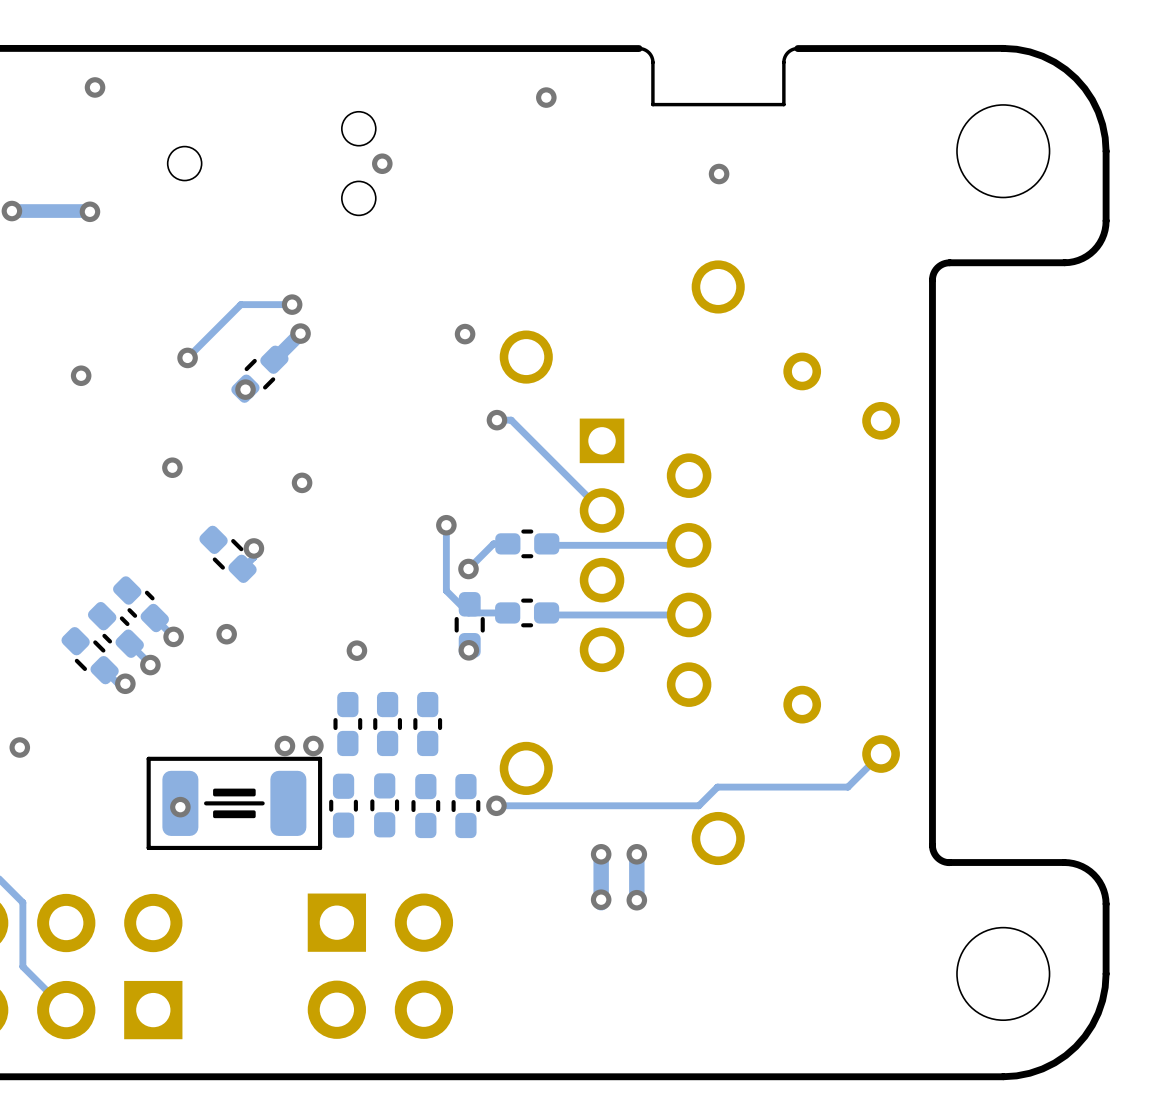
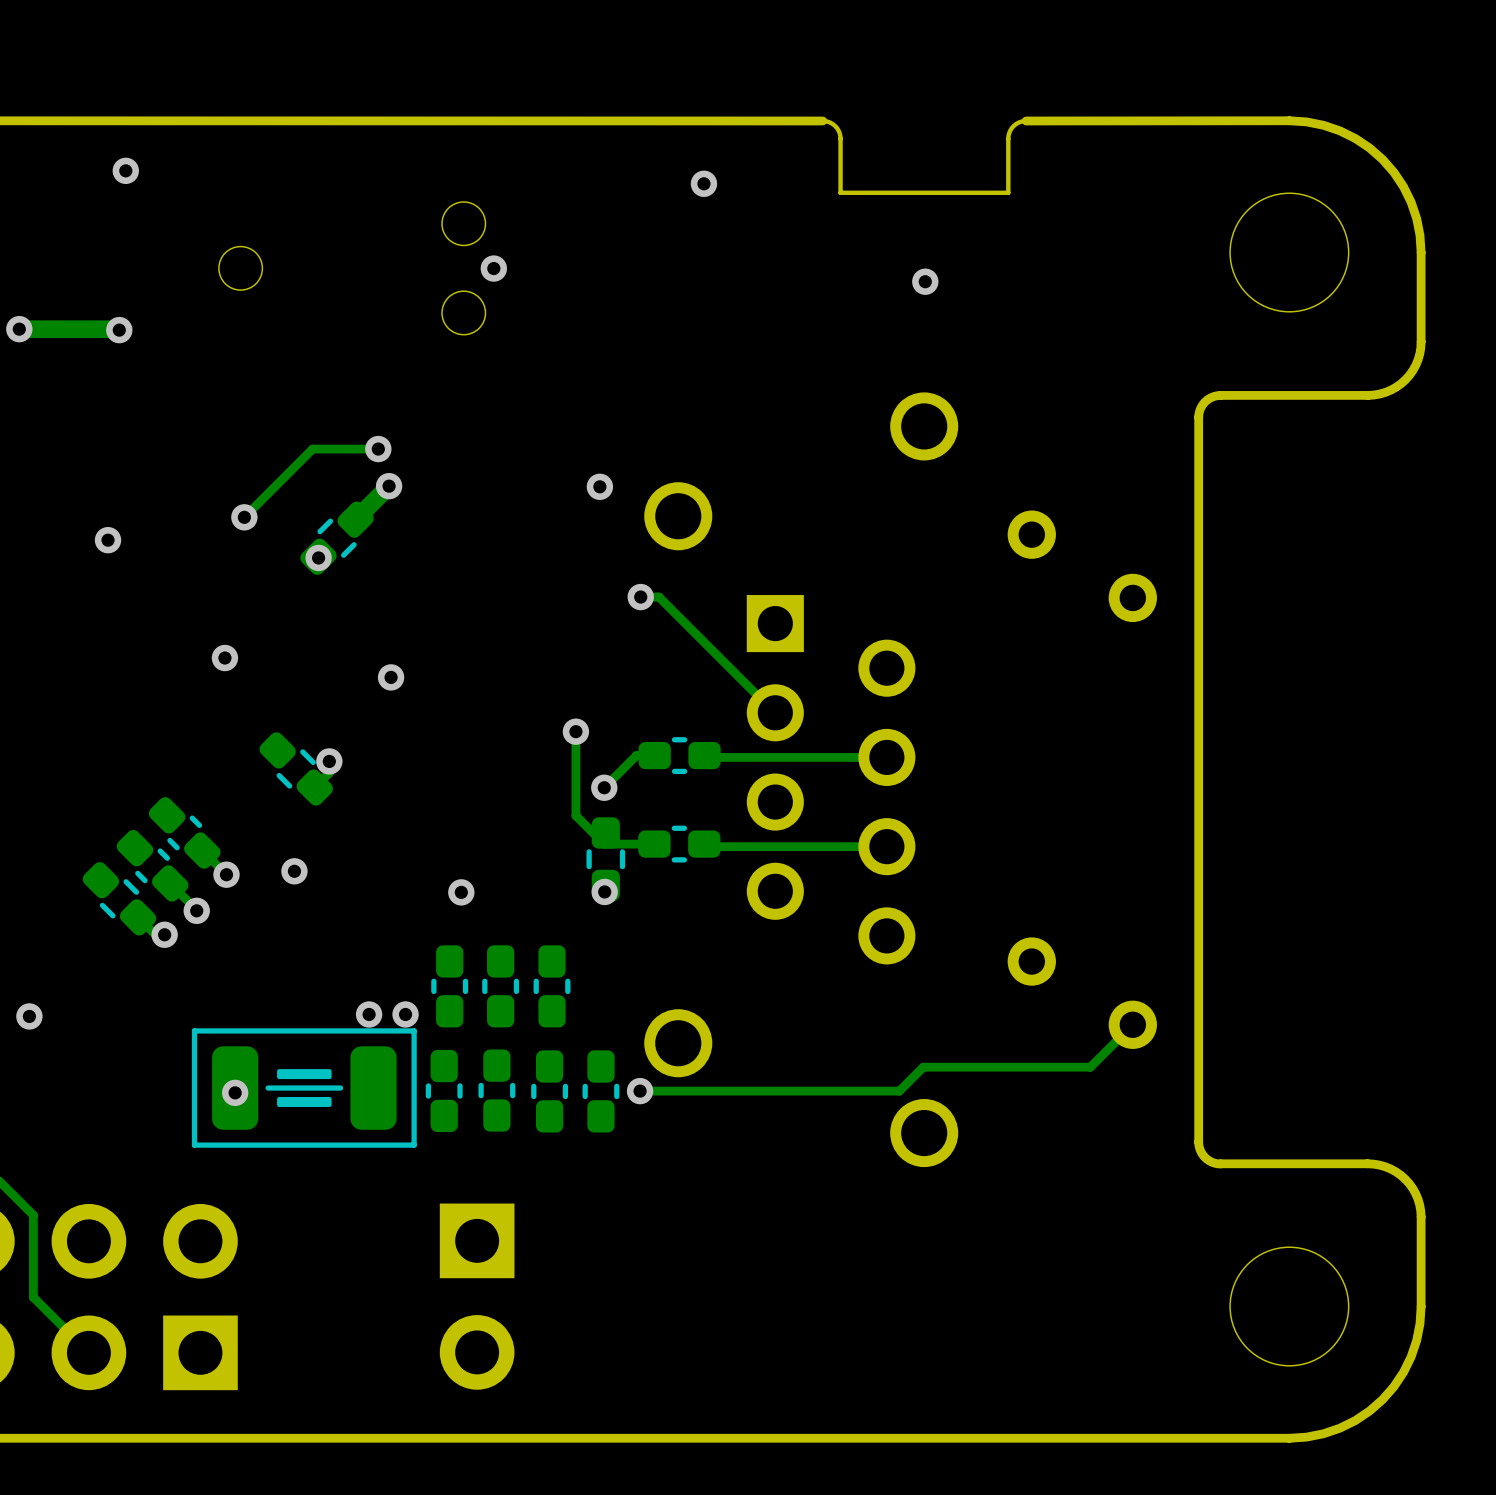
track: (601, 854) (601, 902) -> none
via: (601, 854) -> none
track: (636, 854) (636, 901) -> none
via: (636, 854) -> none
part footprint: [307, 893, 454, 1039] -> [439, 1203, 515, 1390]
via: (601, 899) -> none
via: (636, 900) -> none

